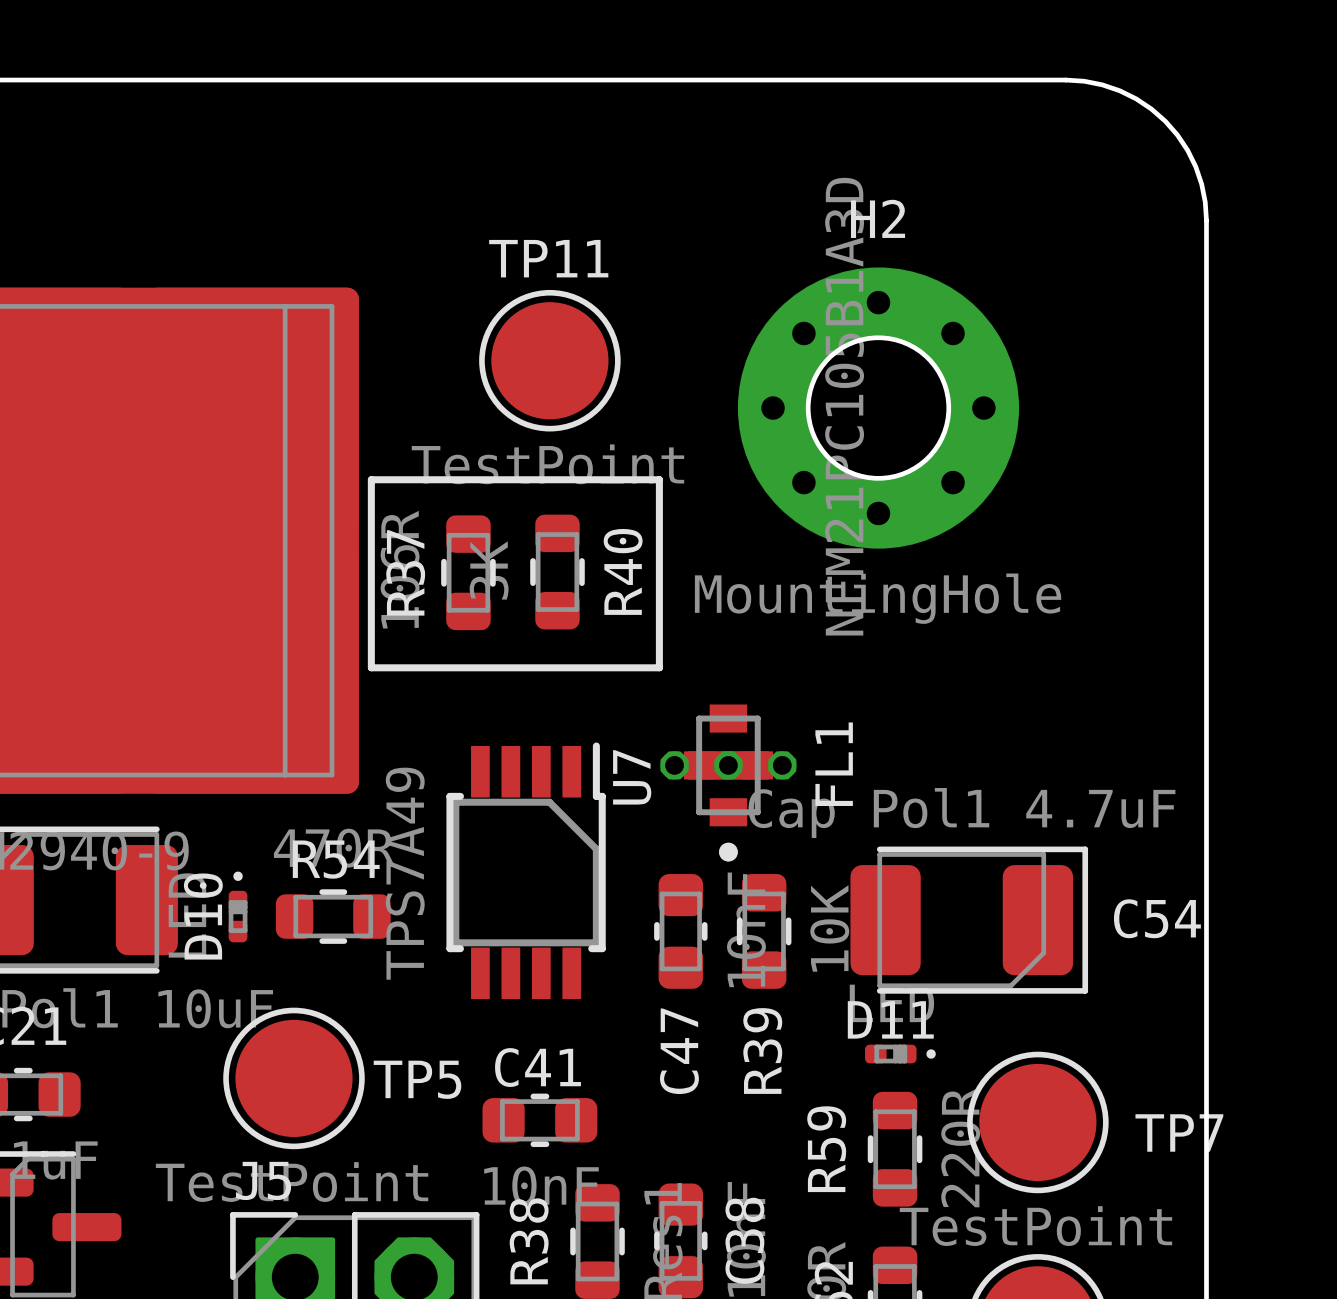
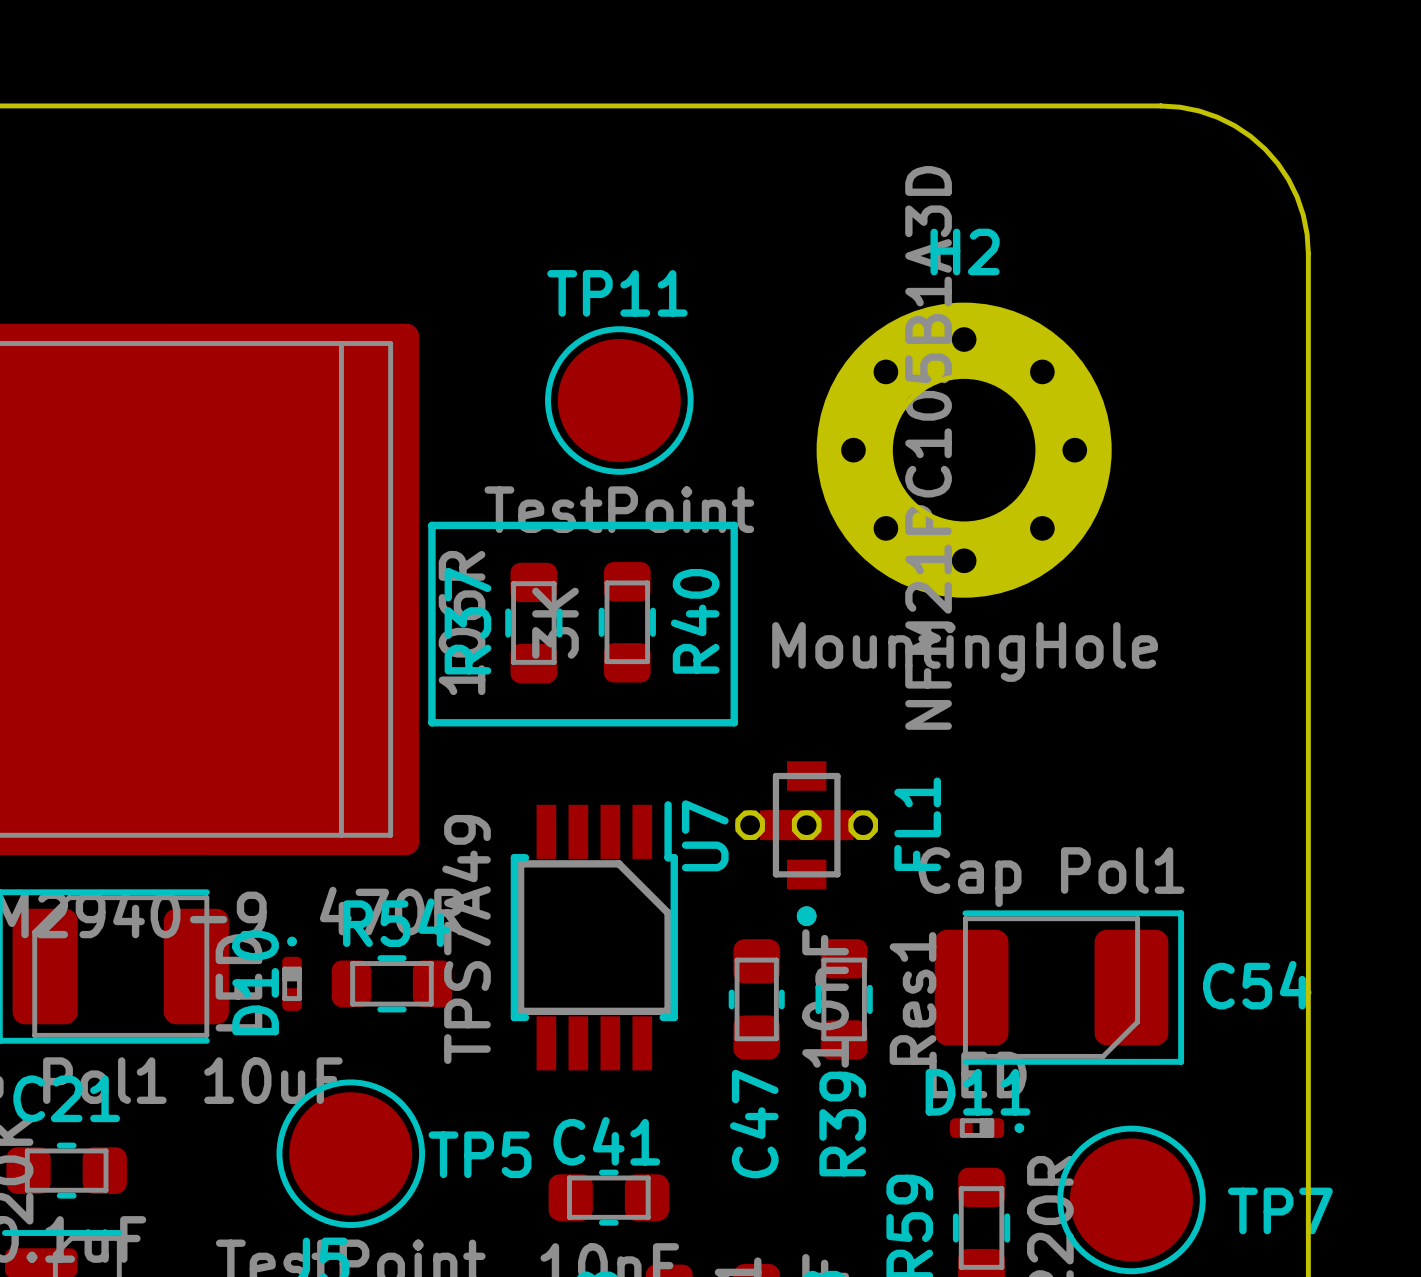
C54 value: Cap Pol1 4.7uF (961, 813) -> Cap Pol1 (1051, 877)
R39 value: 10K (829, 928) -> Res1 (913, 998)

